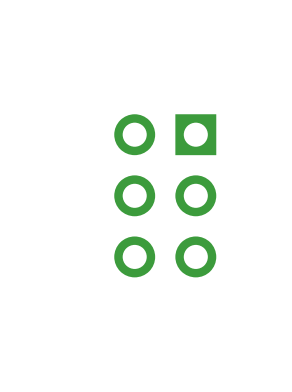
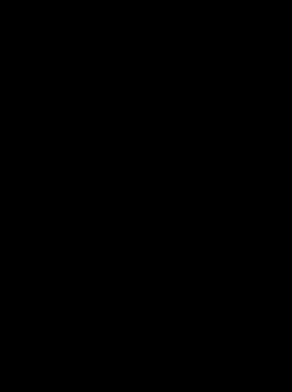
part: (165, 195) -> none

